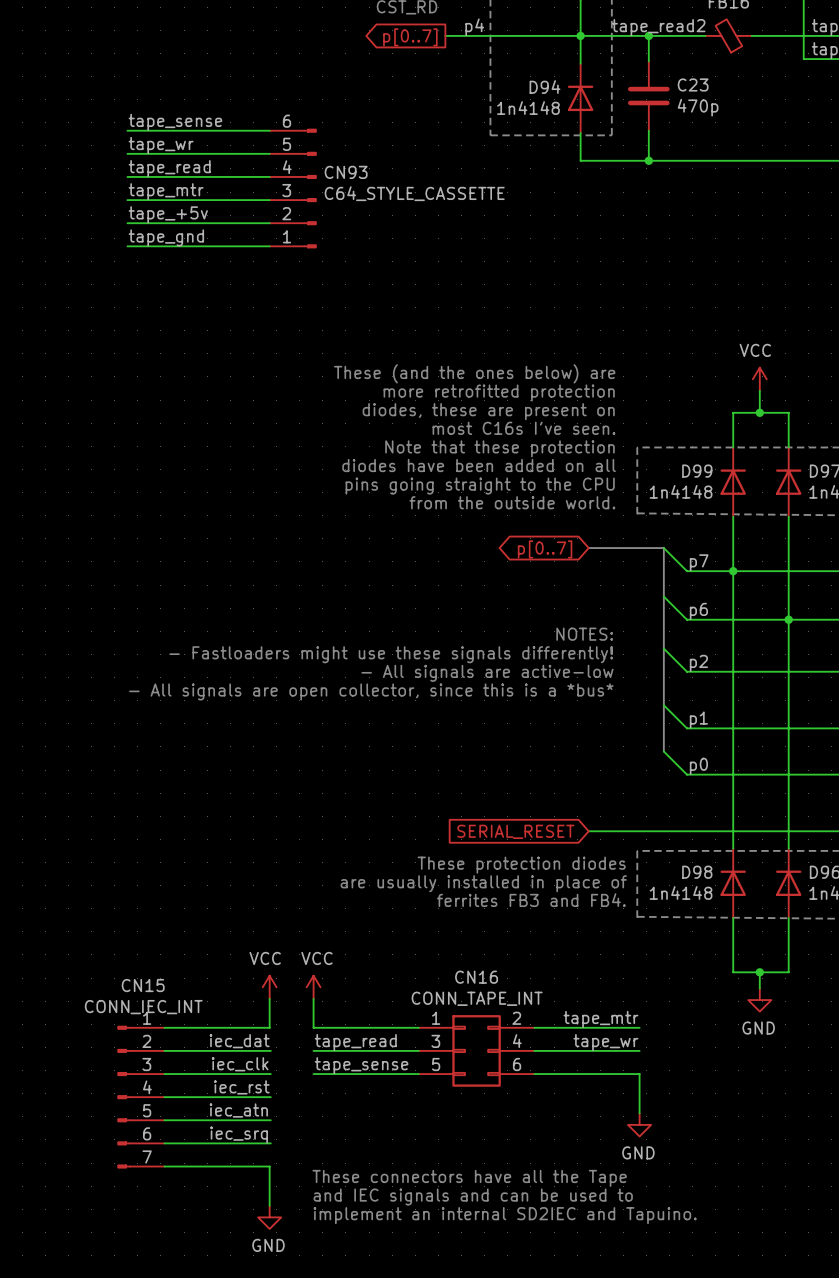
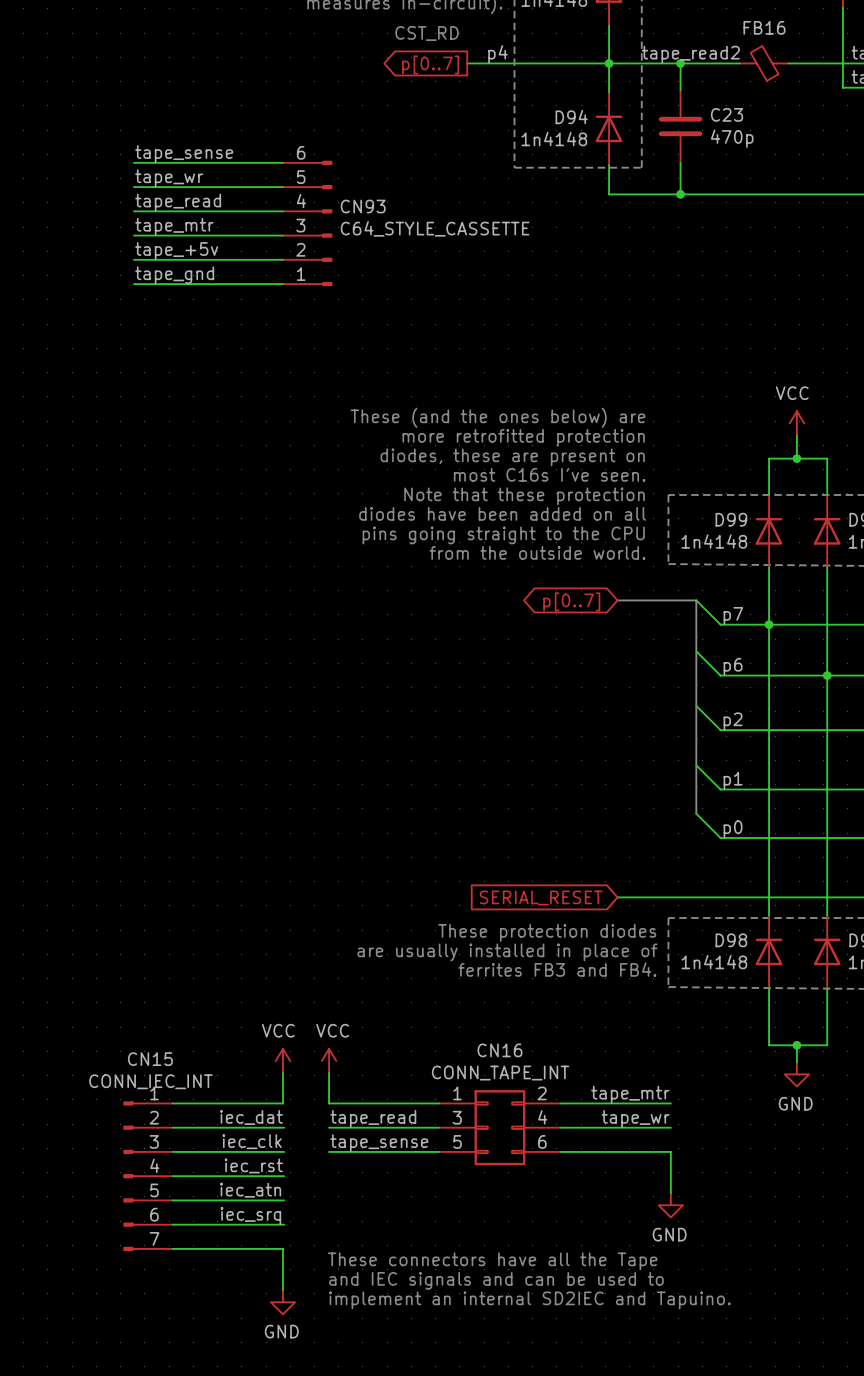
text: NOTES: (584, 634) -> none
text: - Fastloaders might use these signals differently! (391, 654) -> none
text: - All signals are active-low (487, 673) -> none
text: - All signals are open collector, since this is a *bus* (371, 691) -> none

